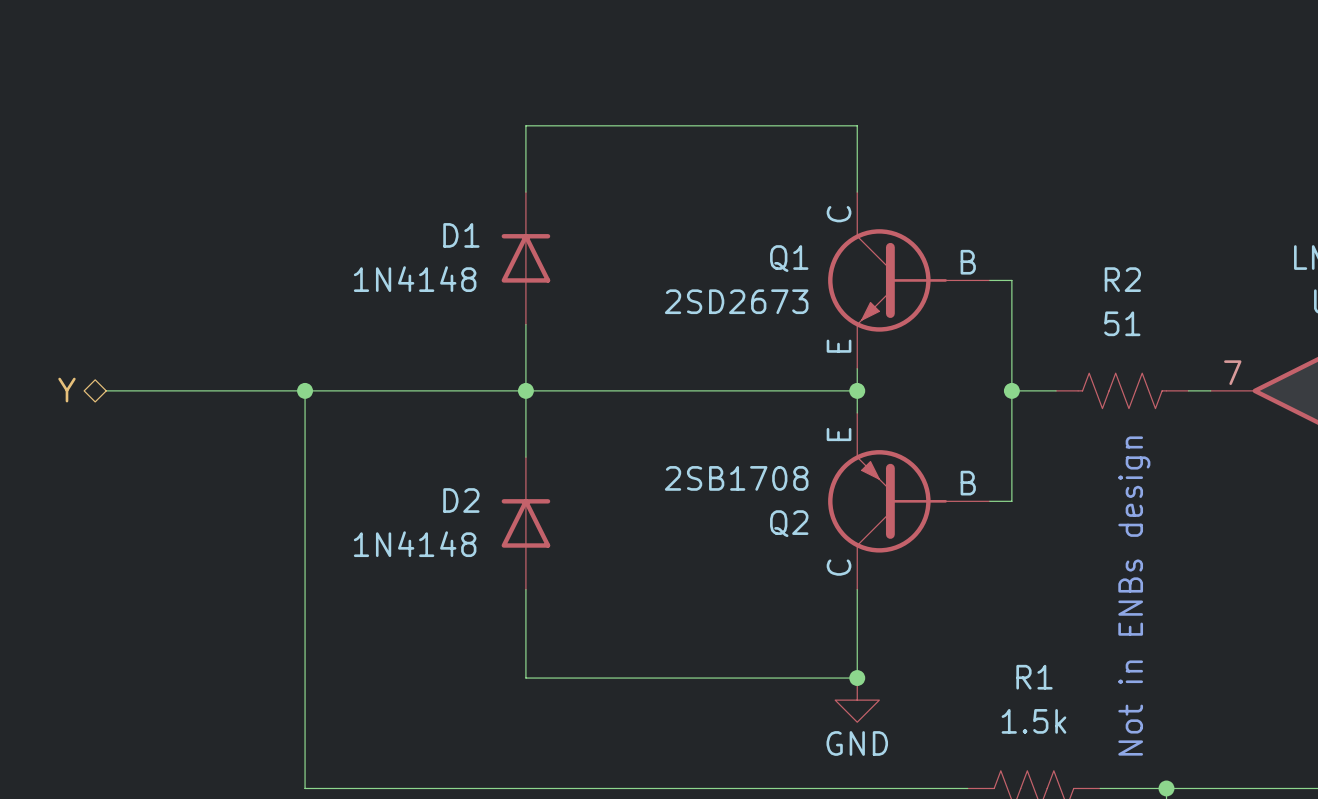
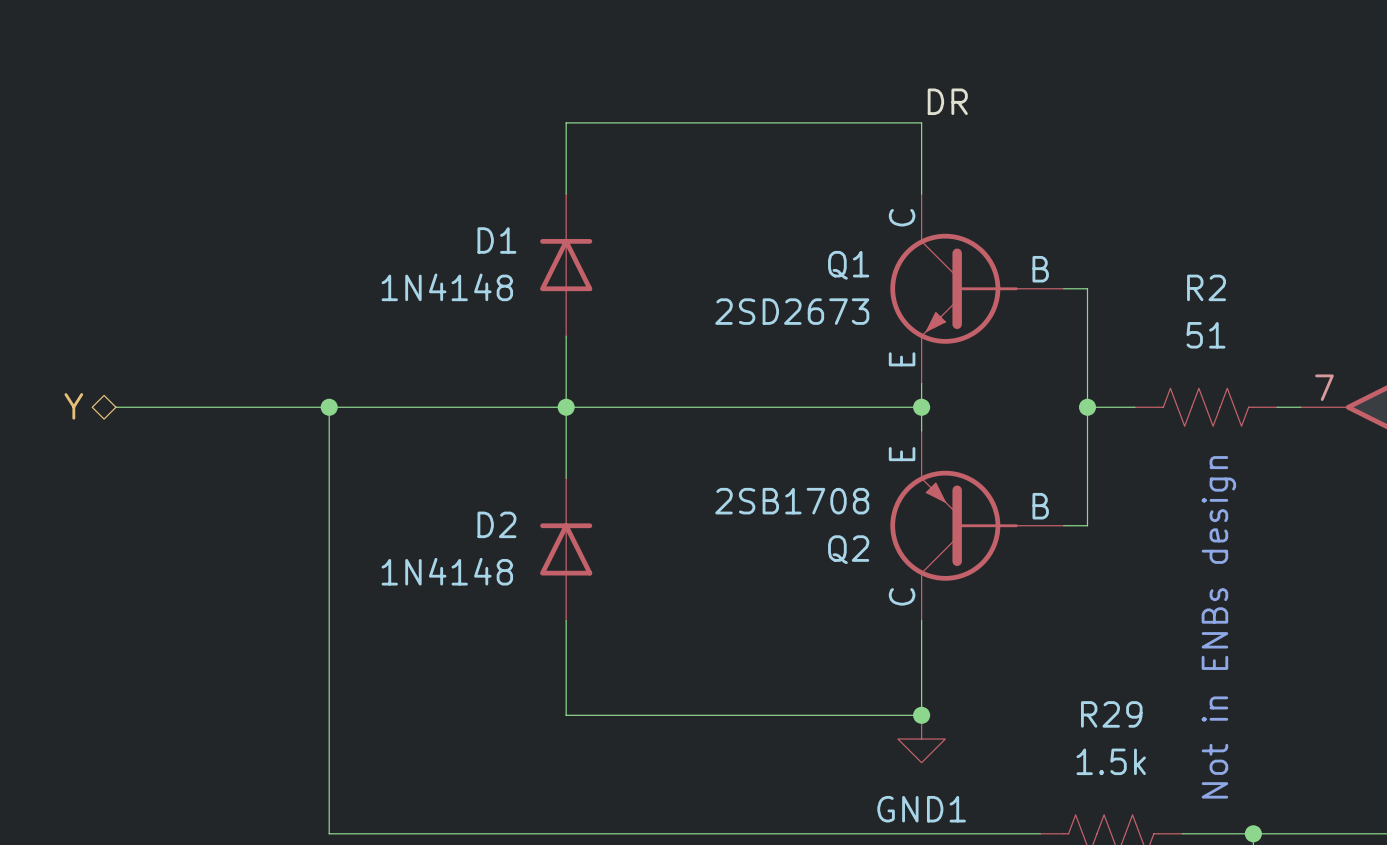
label: none -> DR (947, 101)
R1 name: R1 (1034, 677) -> R29 (1111, 714)
power symbol: GND (857, 700) -> GND1 (921, 739)

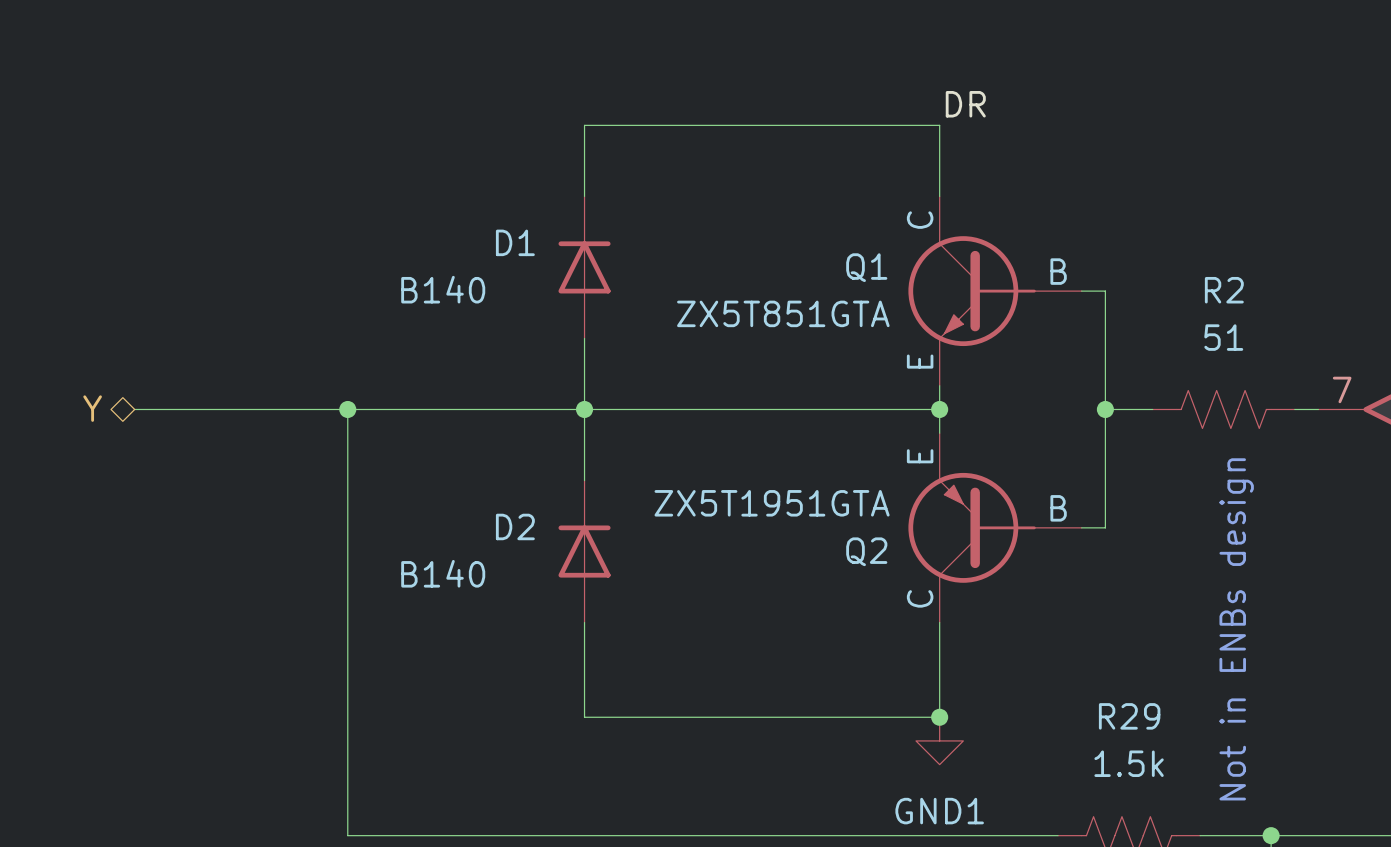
D1 value: 1N4148 (447, 287) -> B140 (443, 289)
Q1 value: 2SD2673 (792, 311) -> ZX5T851GTA (783, 313)
Q2 value: 2SB1708 (792, 501) -> ZX5T1951GTA (772, 503)
D2 value: 1N4148 (447, 571) -> B140 (443, 573)

